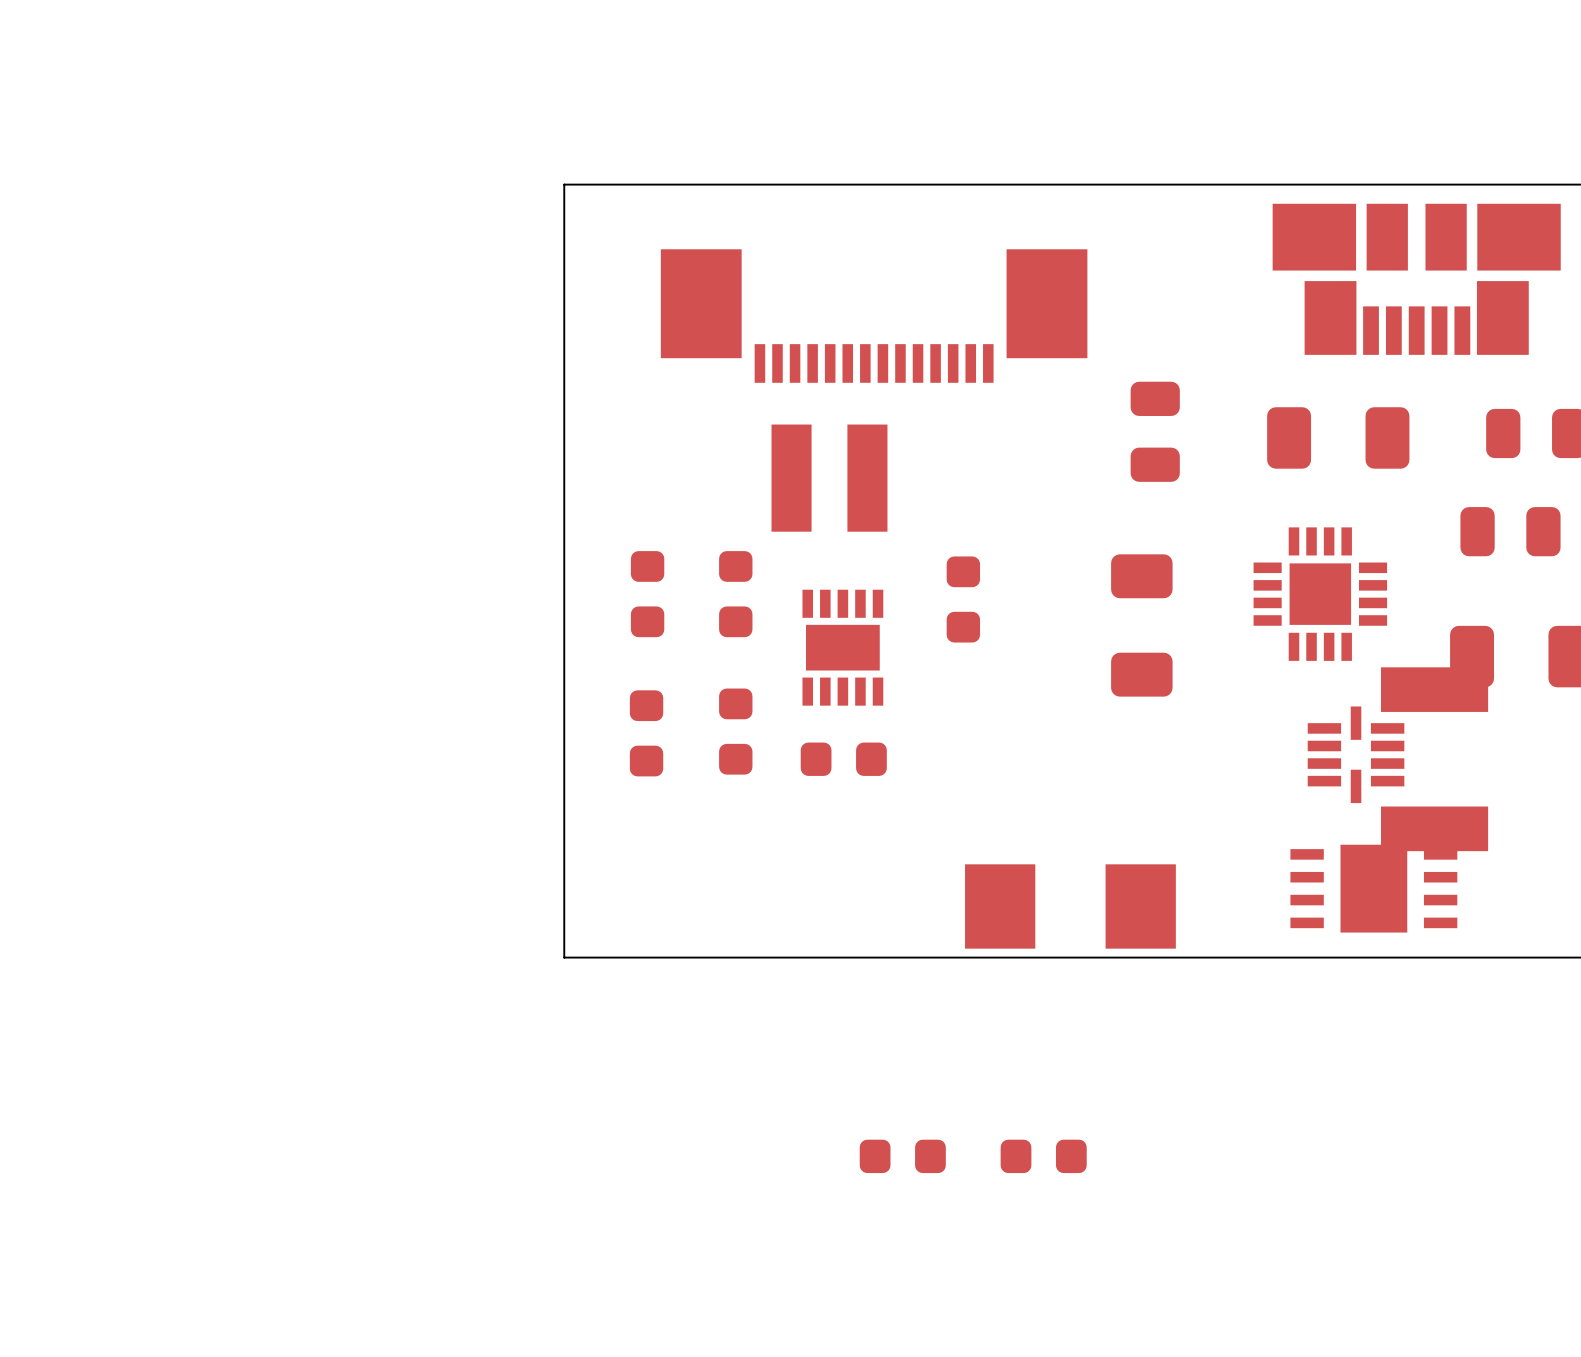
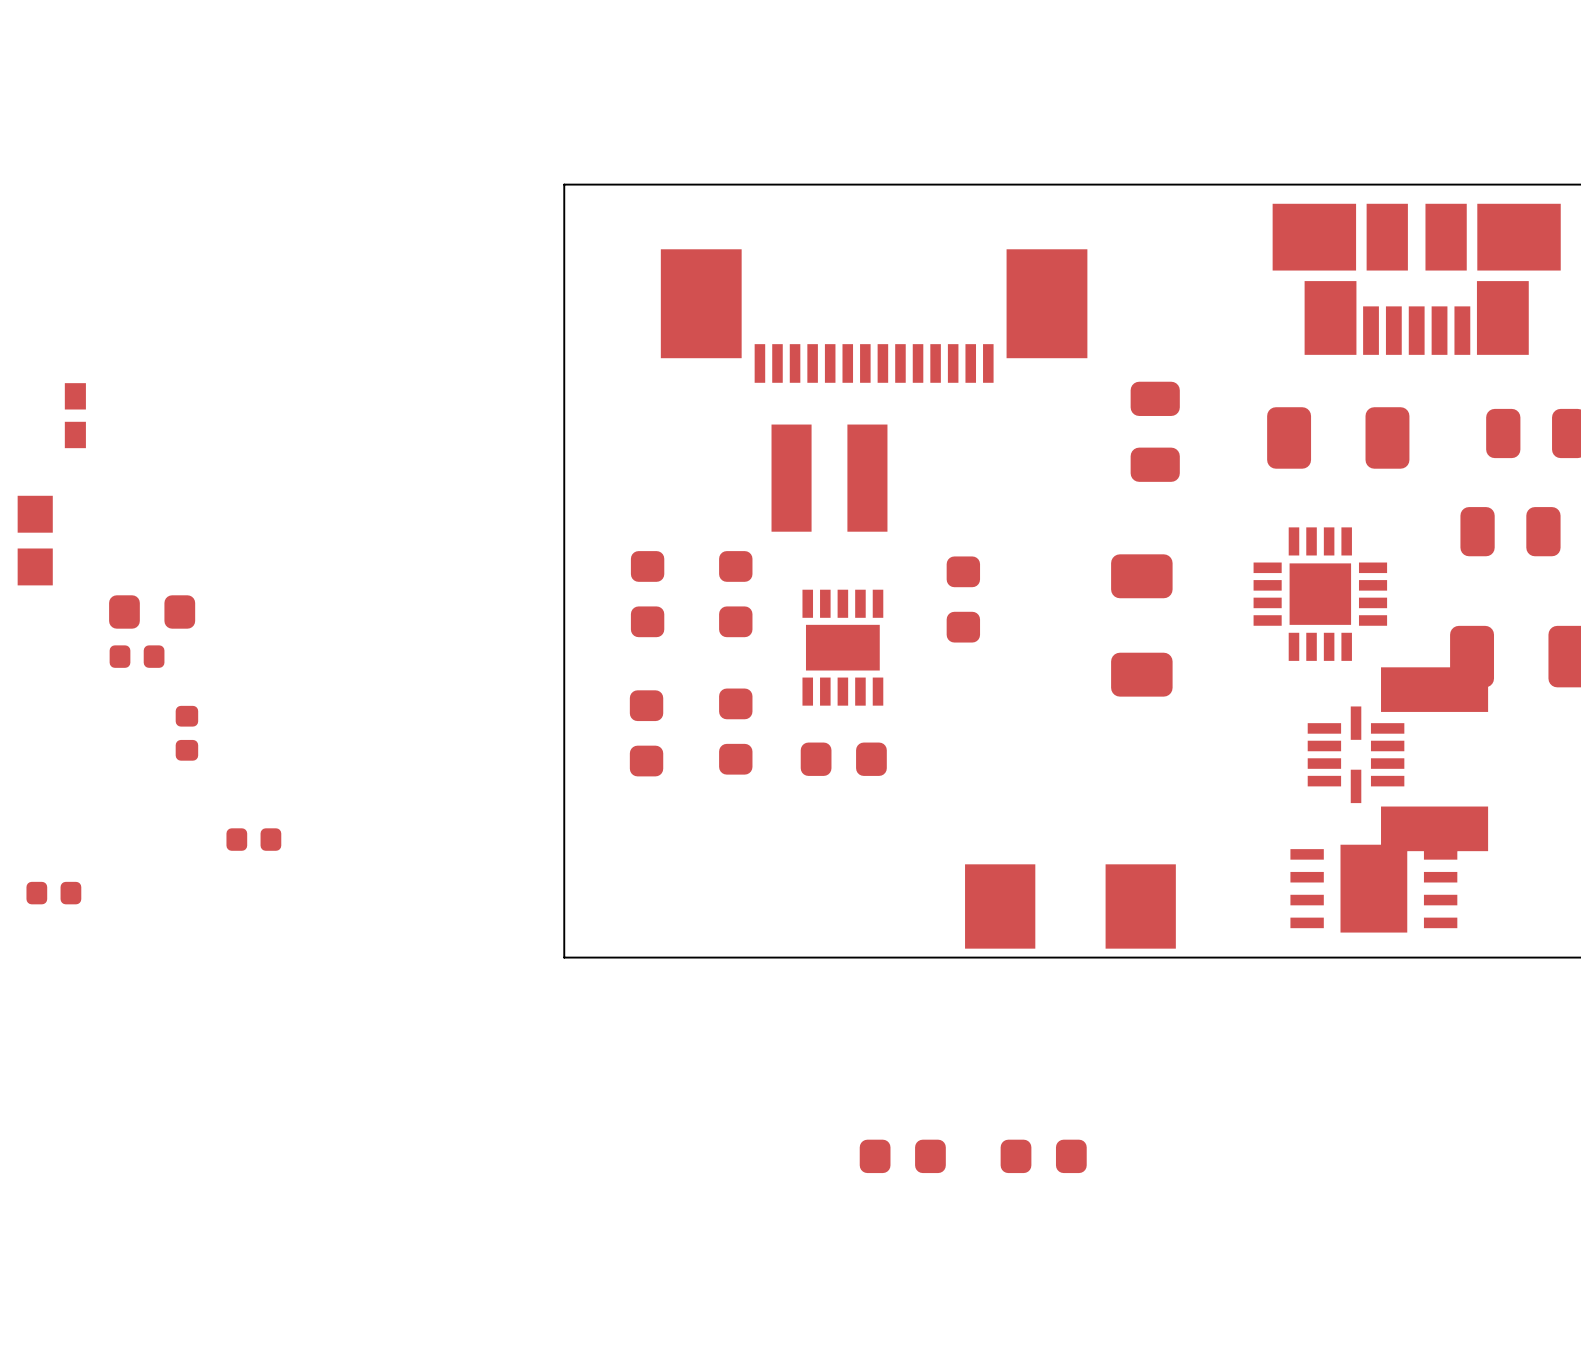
part: none -> (75, 415)
part: none -> (35, 540)
part: none -> (152, 611)
part: none -> (137, 656)
part: none -> (186, 733)
part: none -> (253, 839)
part: none -> (53, 893)

